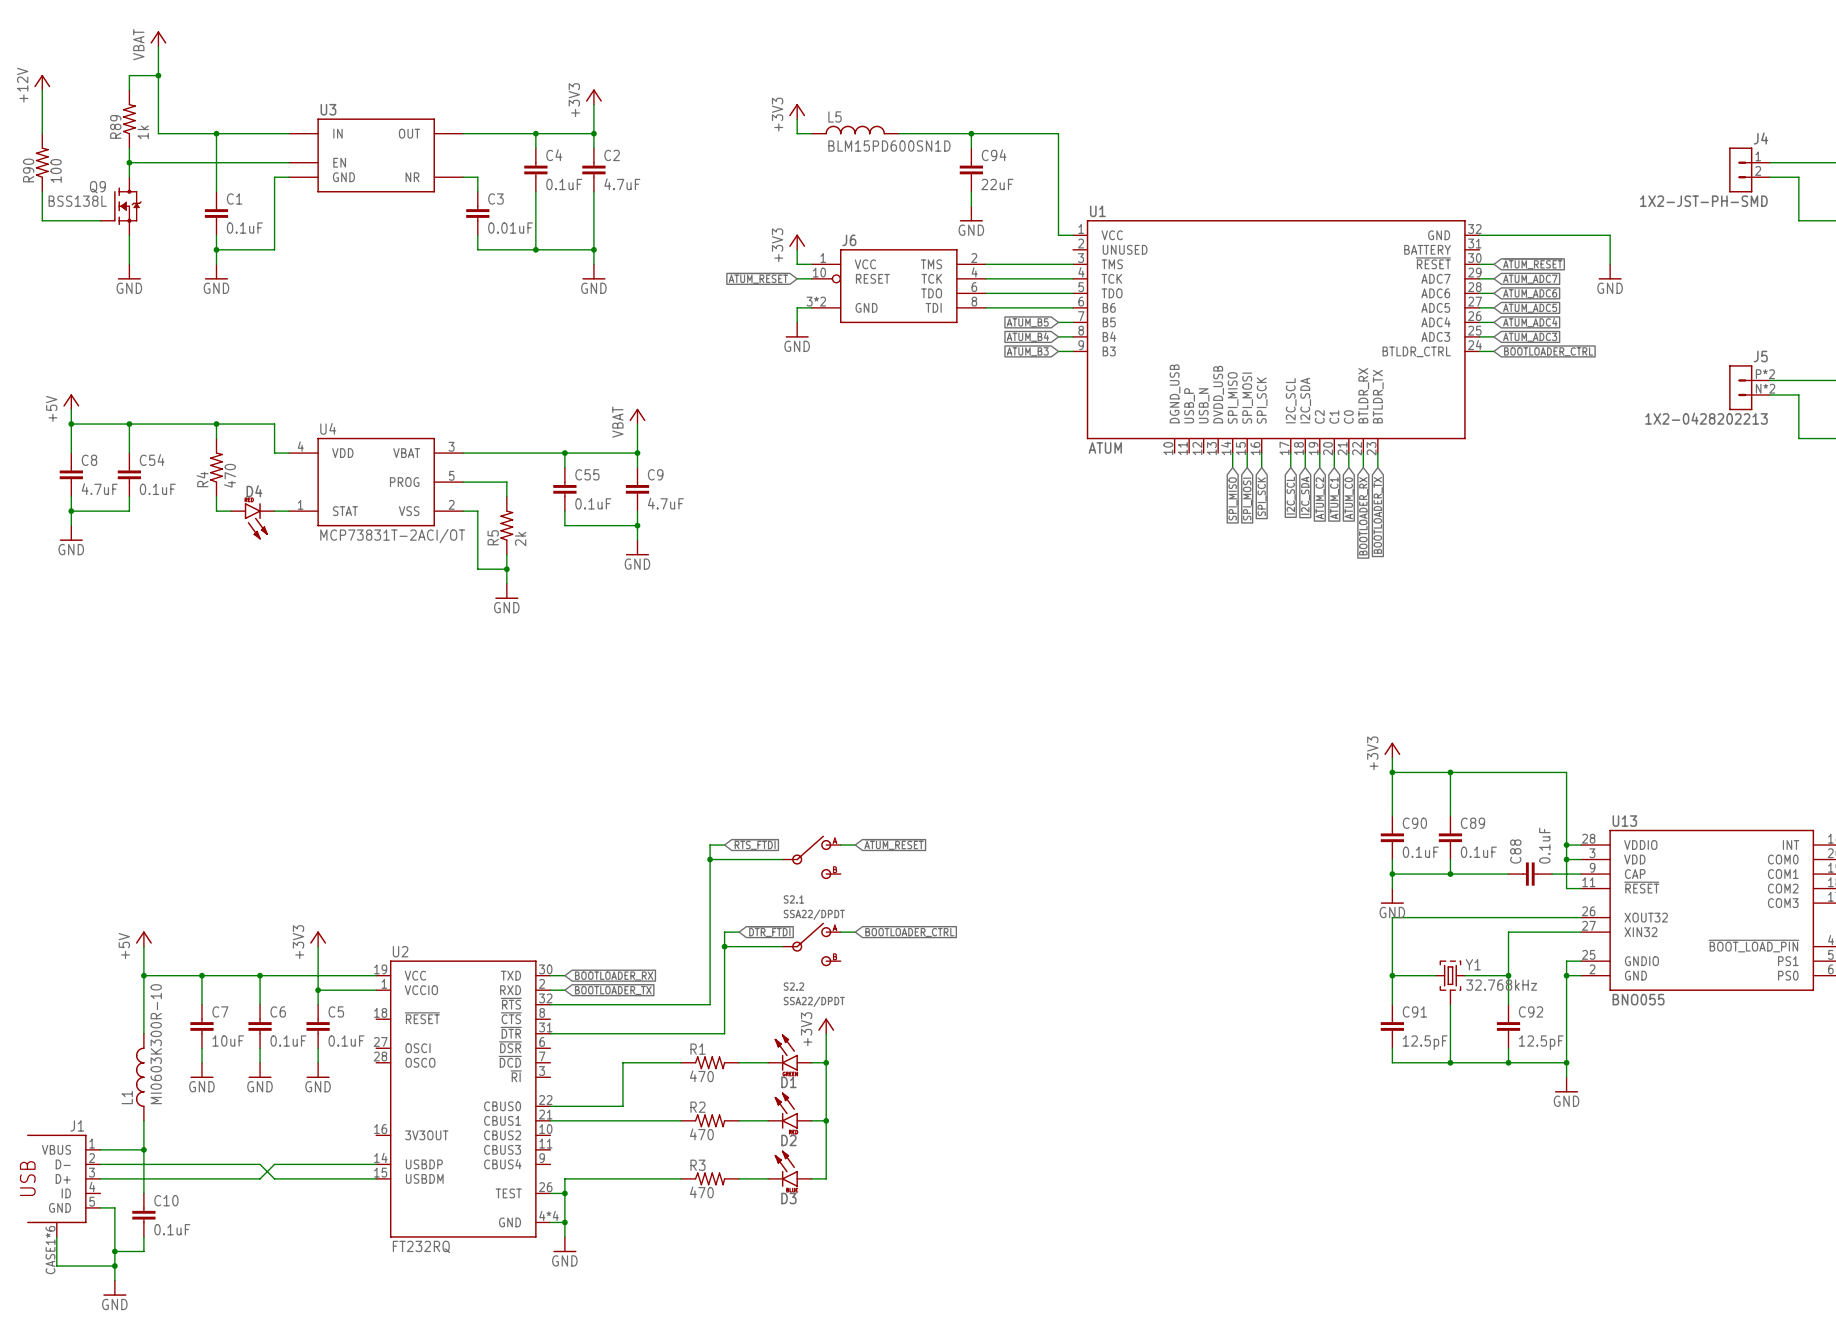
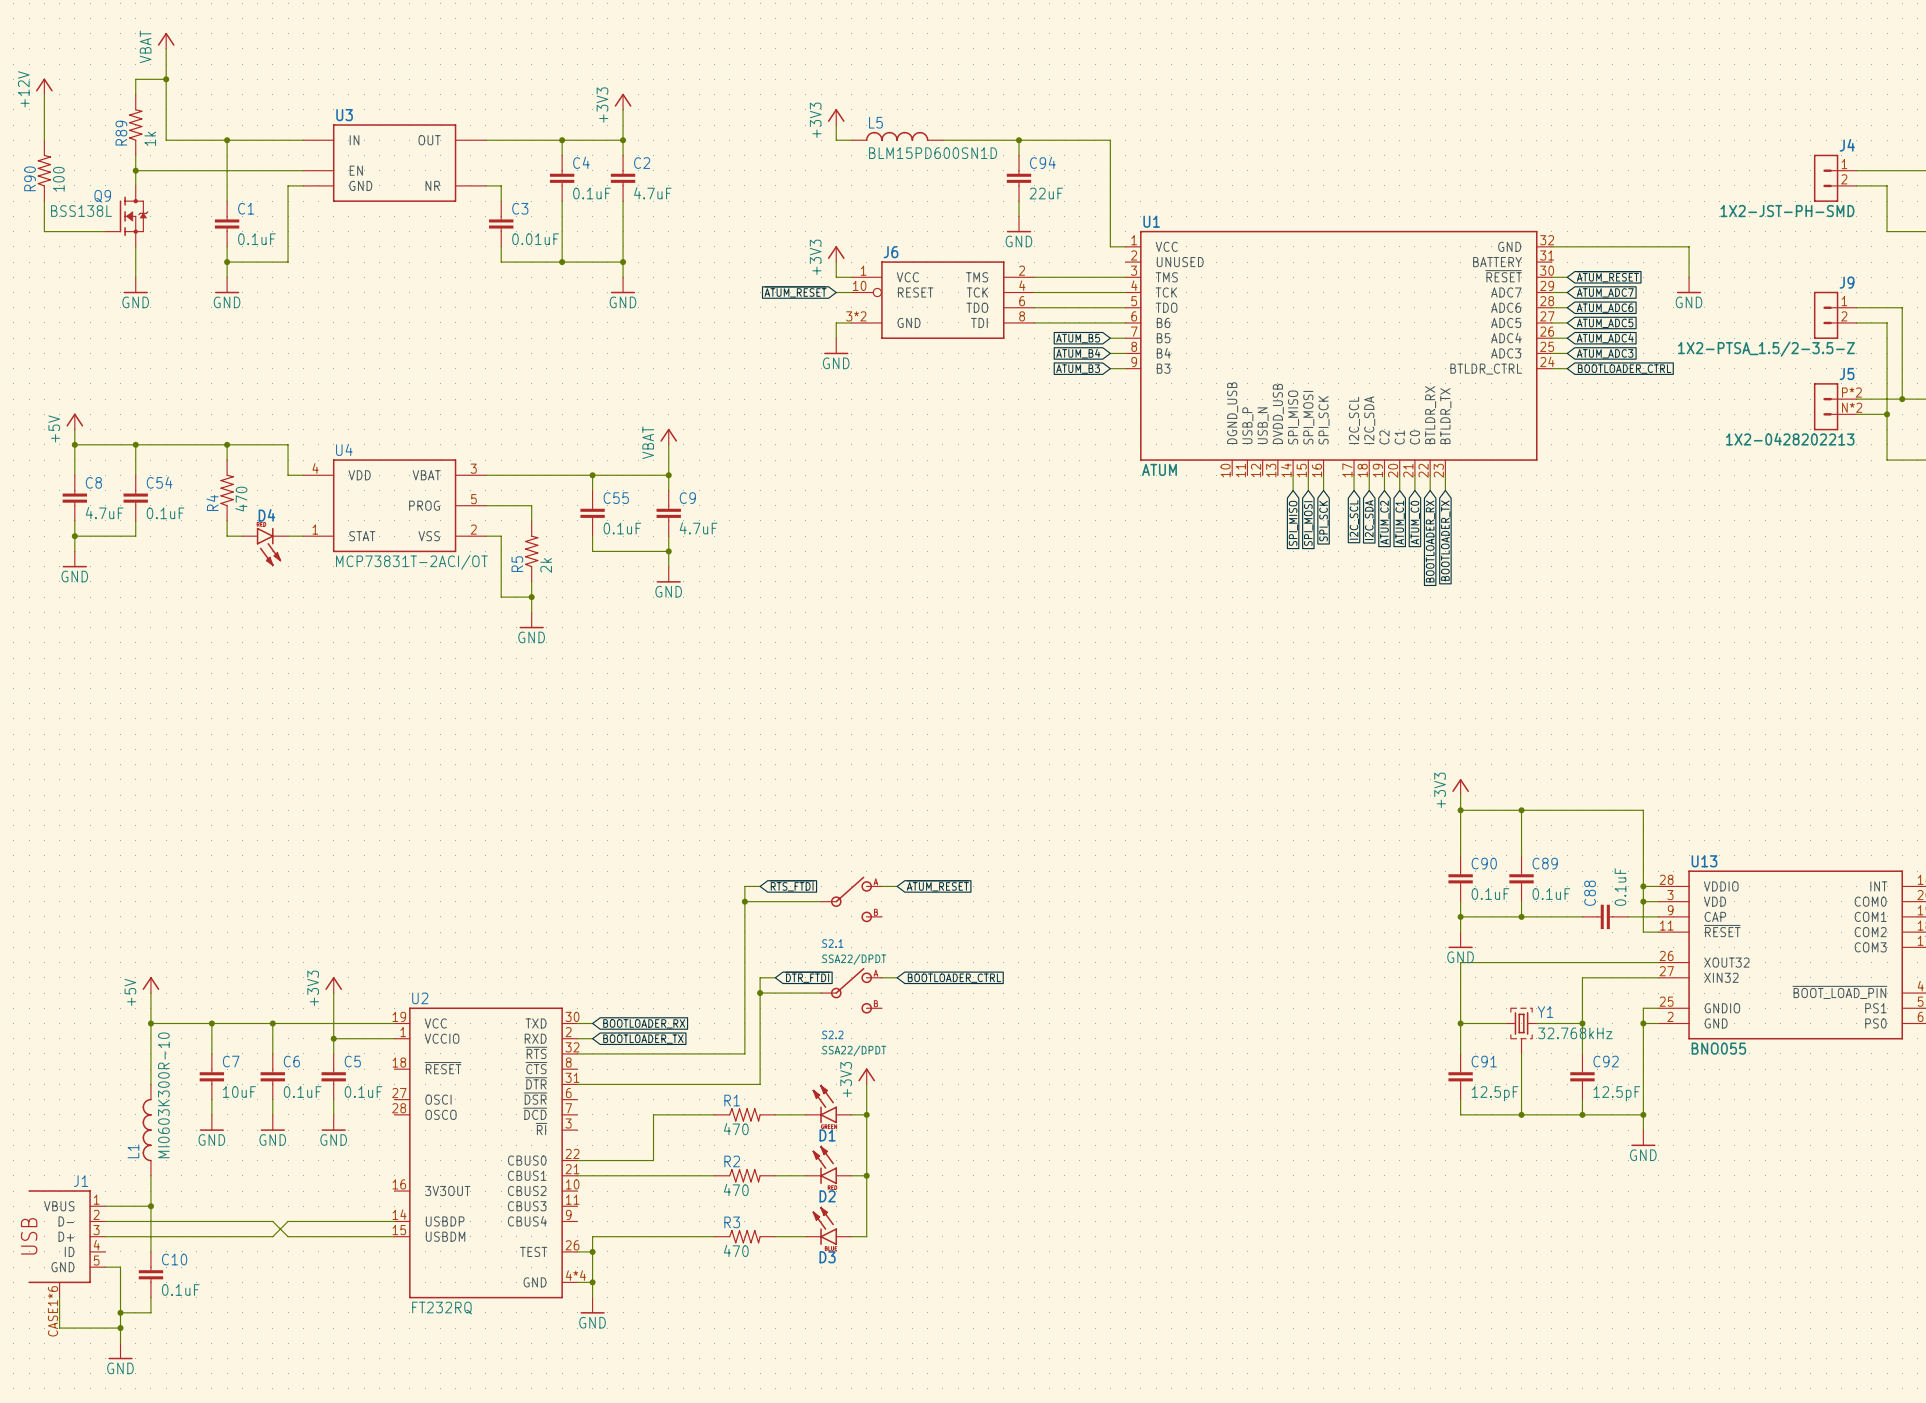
wire: none -> (1856, 307) (1902, 307) (1902, 399)
J9: none -> 1X2-PTSA_1.5/2-3.5-Z (1835, 315)
wire: none -> (1856, 322) (1887, 322) (1887, 414)
junction: none -> (1902, 399)
junction: none -> (1887, 414)

